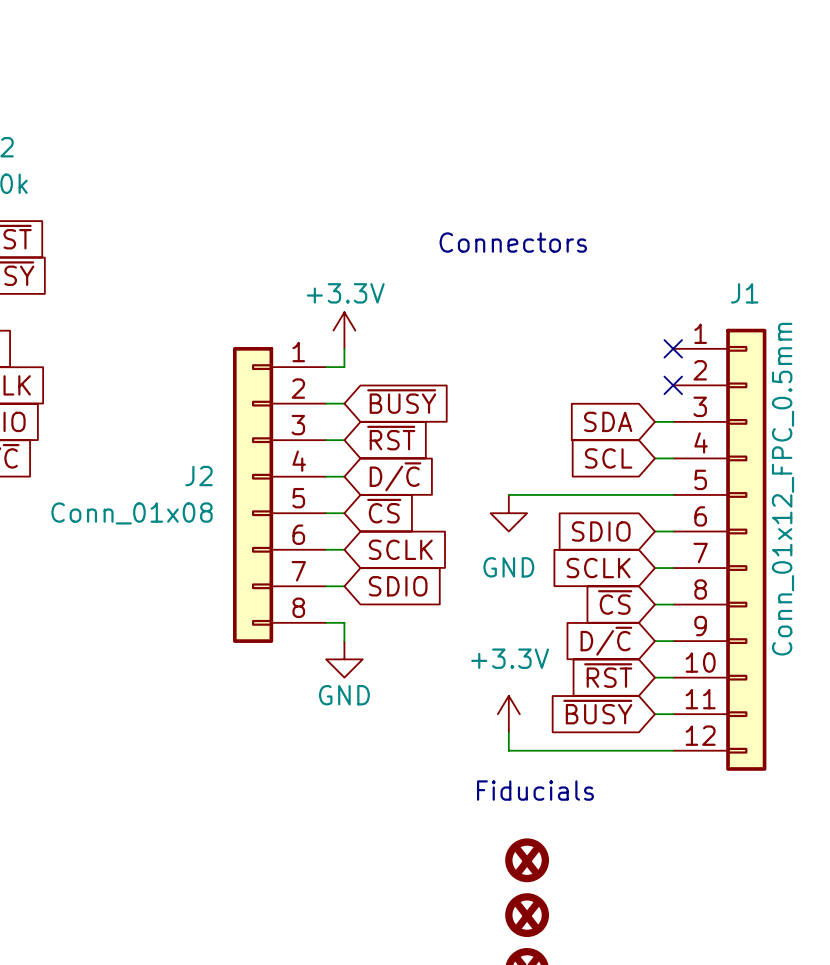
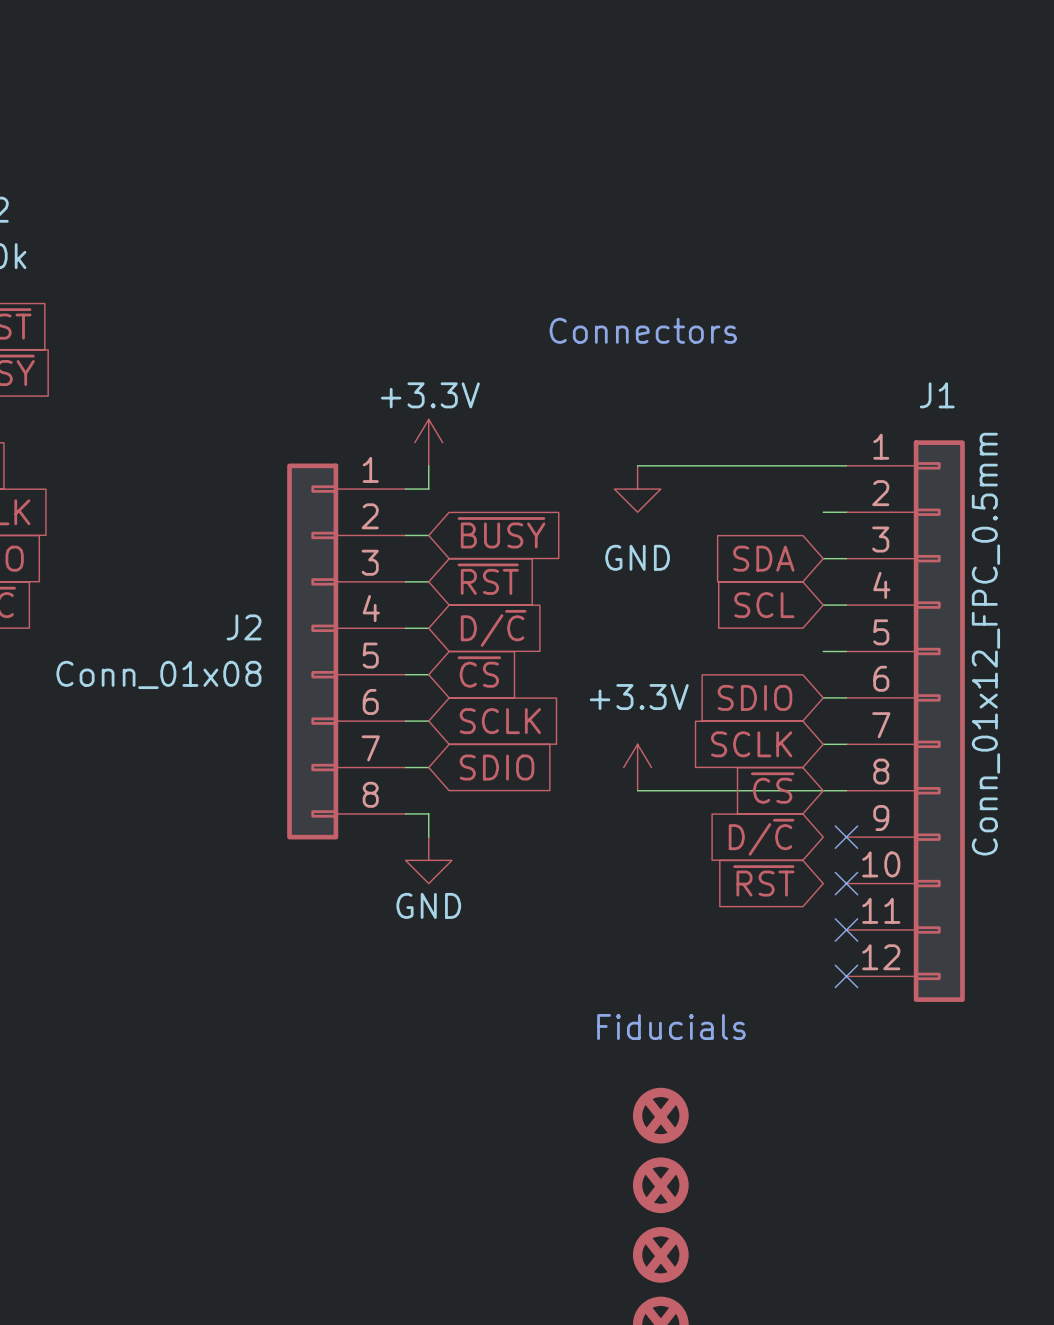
wire: none -> (637, 465) (846, 465)
no-connect mark: (673, 348) -> none
no-connect mark: (673, 385) -> none
wire: (508, 494) (654, 494) -> (637, 790) (823, 790)
power symbol position: GND (508, 513) -> GND (637, 489)
wire: (654, 641) (673, 641) -> (823, 512) (846, 512)
no-connect mark: none -> (846, 837)
wire: (654, 677) (673, 677) -> none
no-connect mark: none -> (846, 883)
global label: ~{BUSY} (597, 712) -> none
power symbol position: +3.3V (508, 714) -> +3.3V (637, 767)
wire: (654, 714) (673, 714) -> none
no-connect mark: none -> (846, 929)
wire: (508, 732) (508, 750) (673, 750) -> none
no-connect mark: none -> (846, 976)

